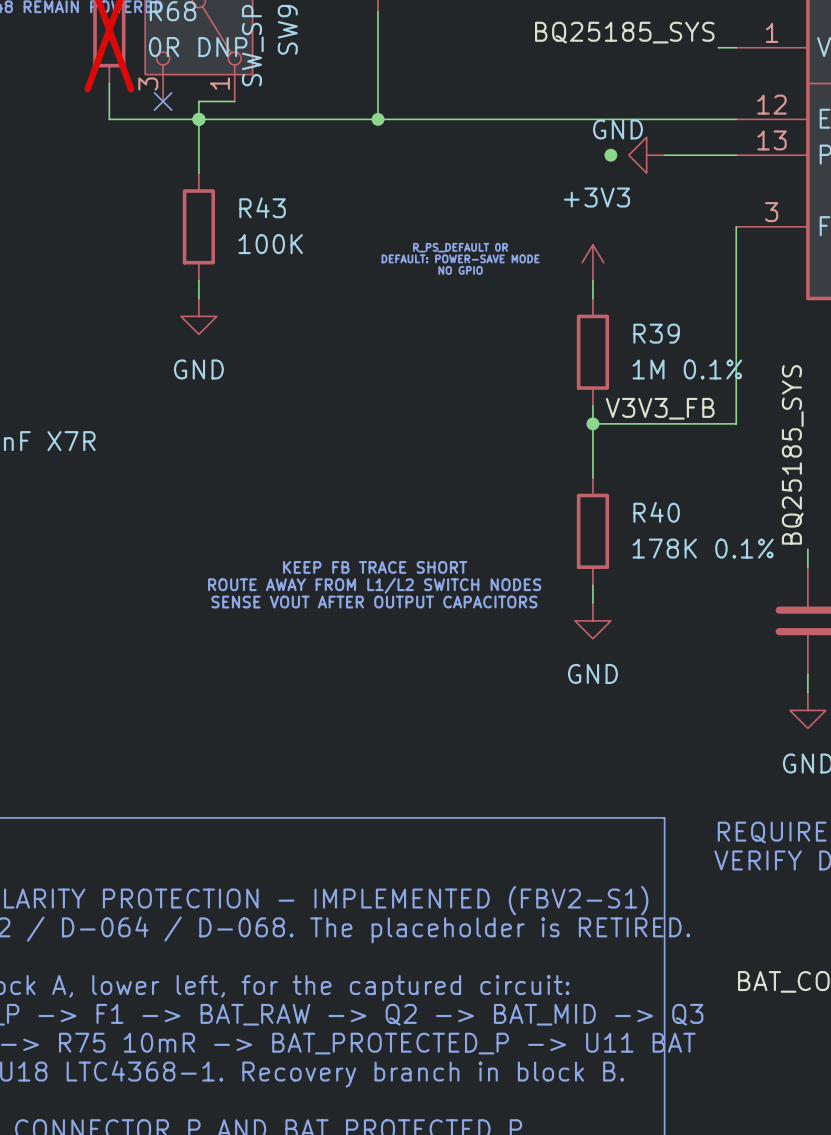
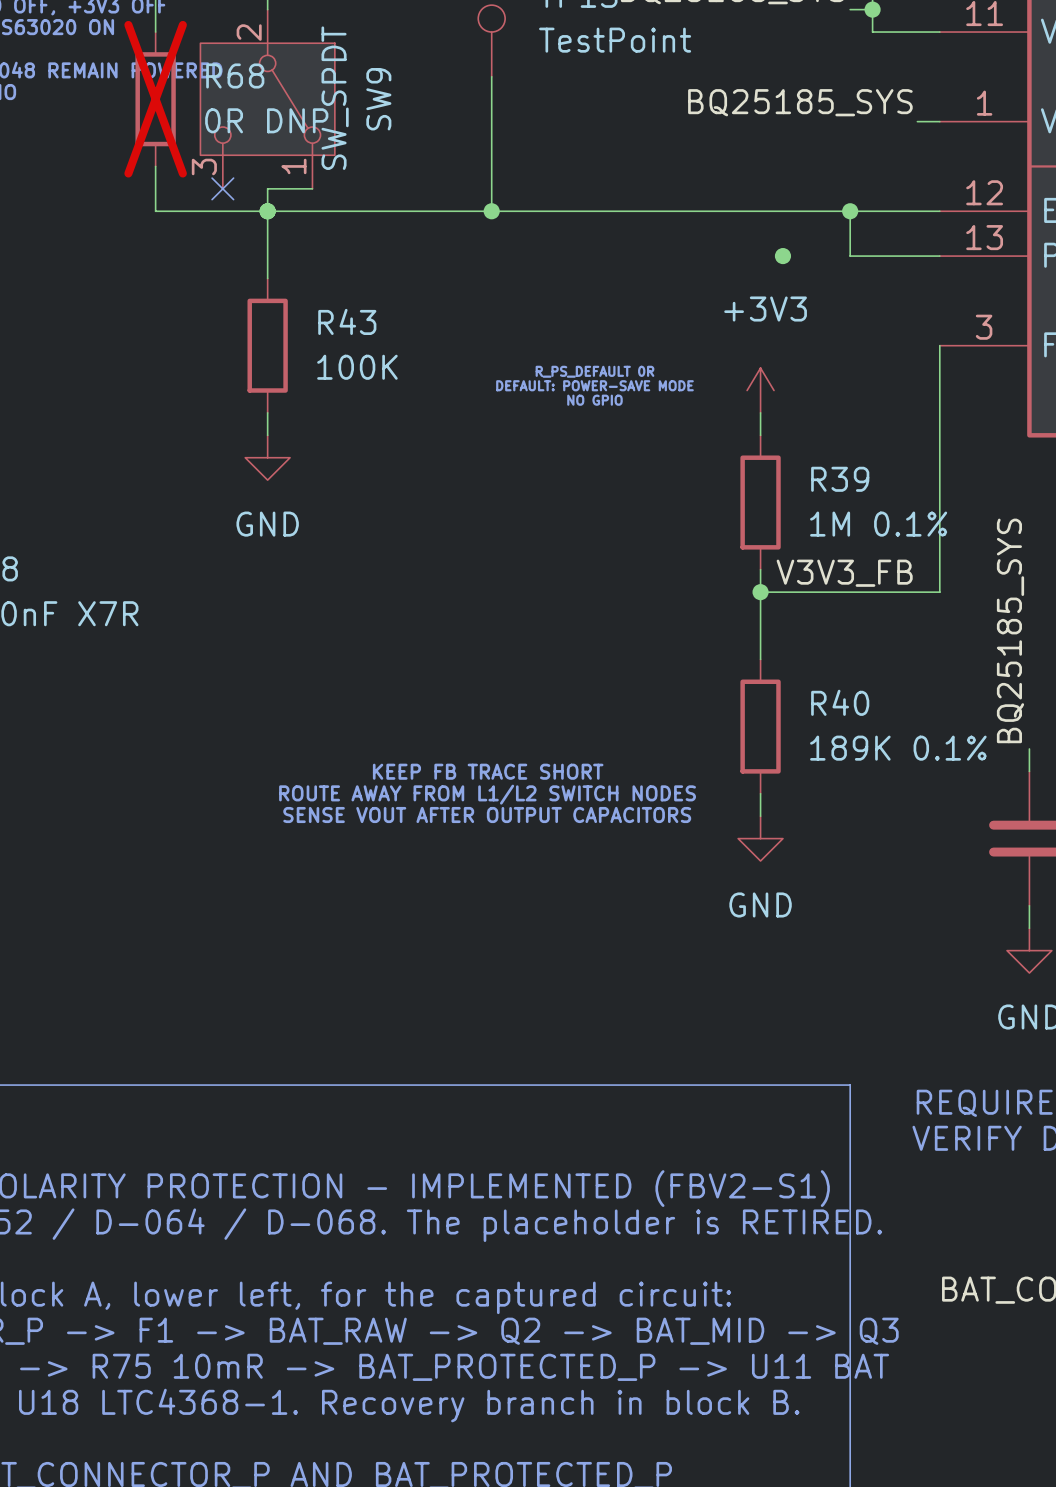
wire: none -> (850, 211) (850, 256)
junction: none -> (850, 211)
power symbol: GND (646, 155) -> none
R40 value: 178K 0.1% (703, 548) -> 189K 0.1% (898, 748)

